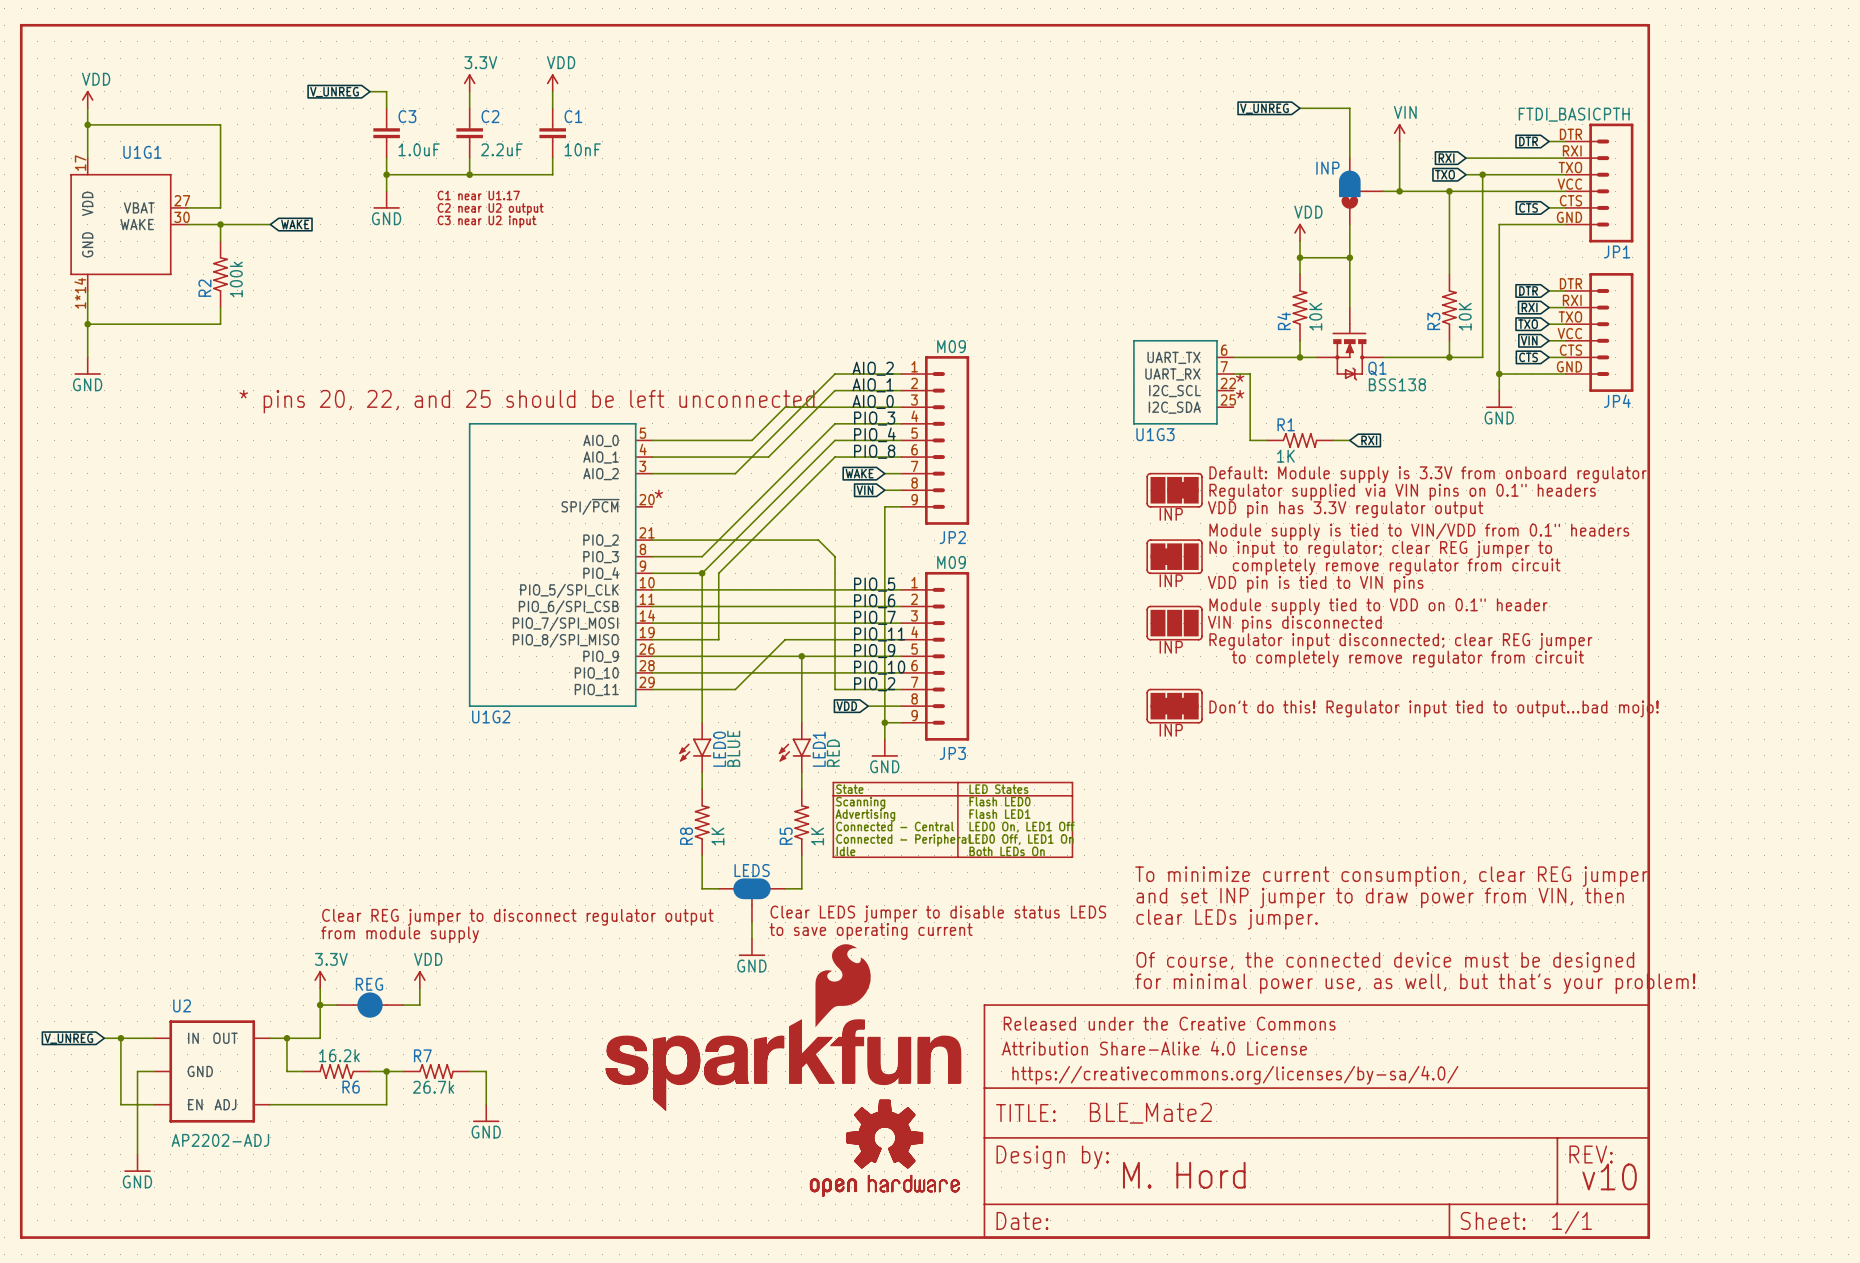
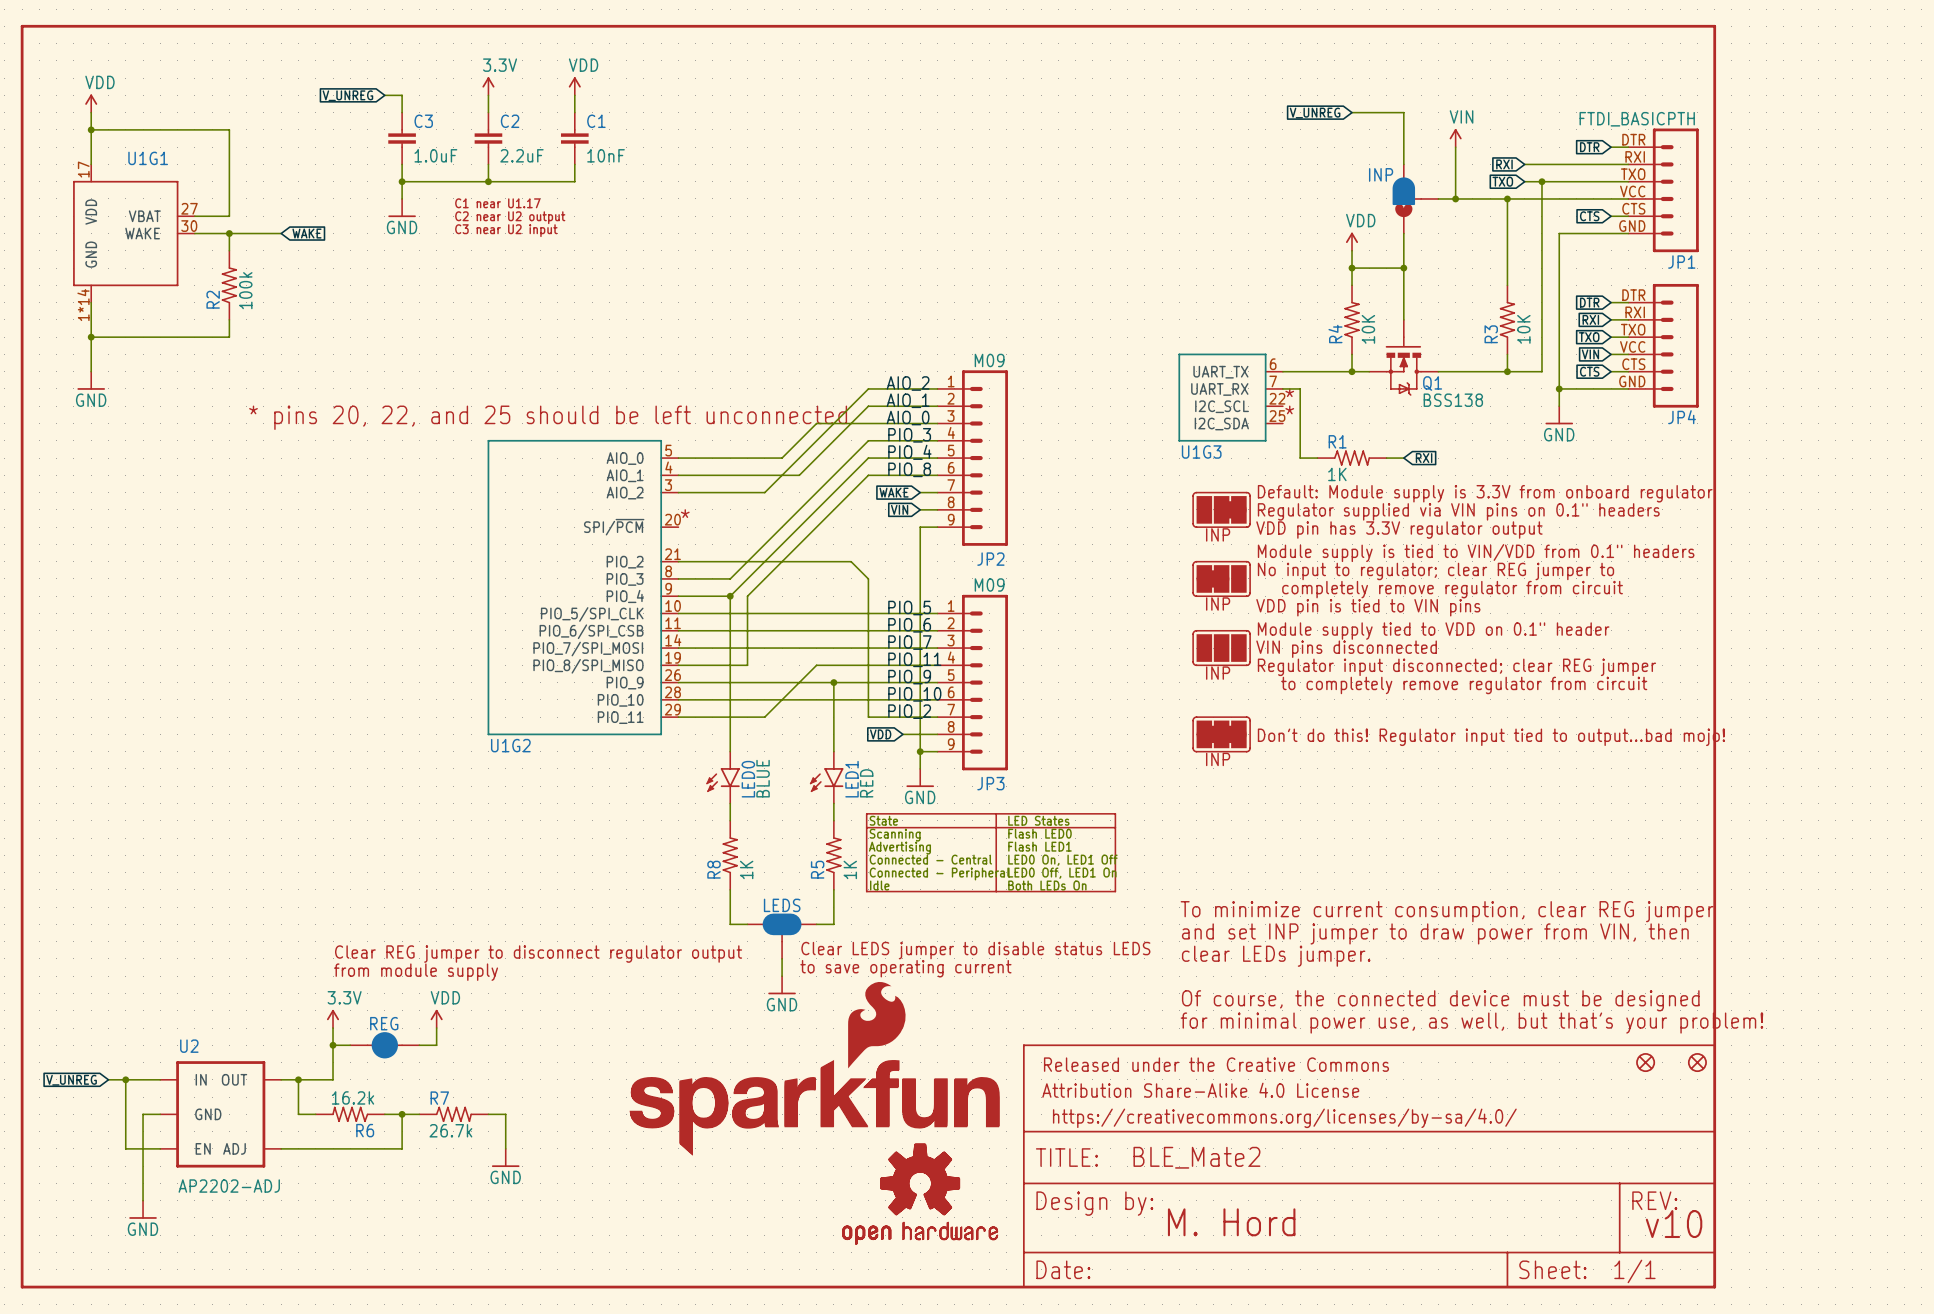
part: none -> (1645, 1062)
part: none -> (1697, 1062)

